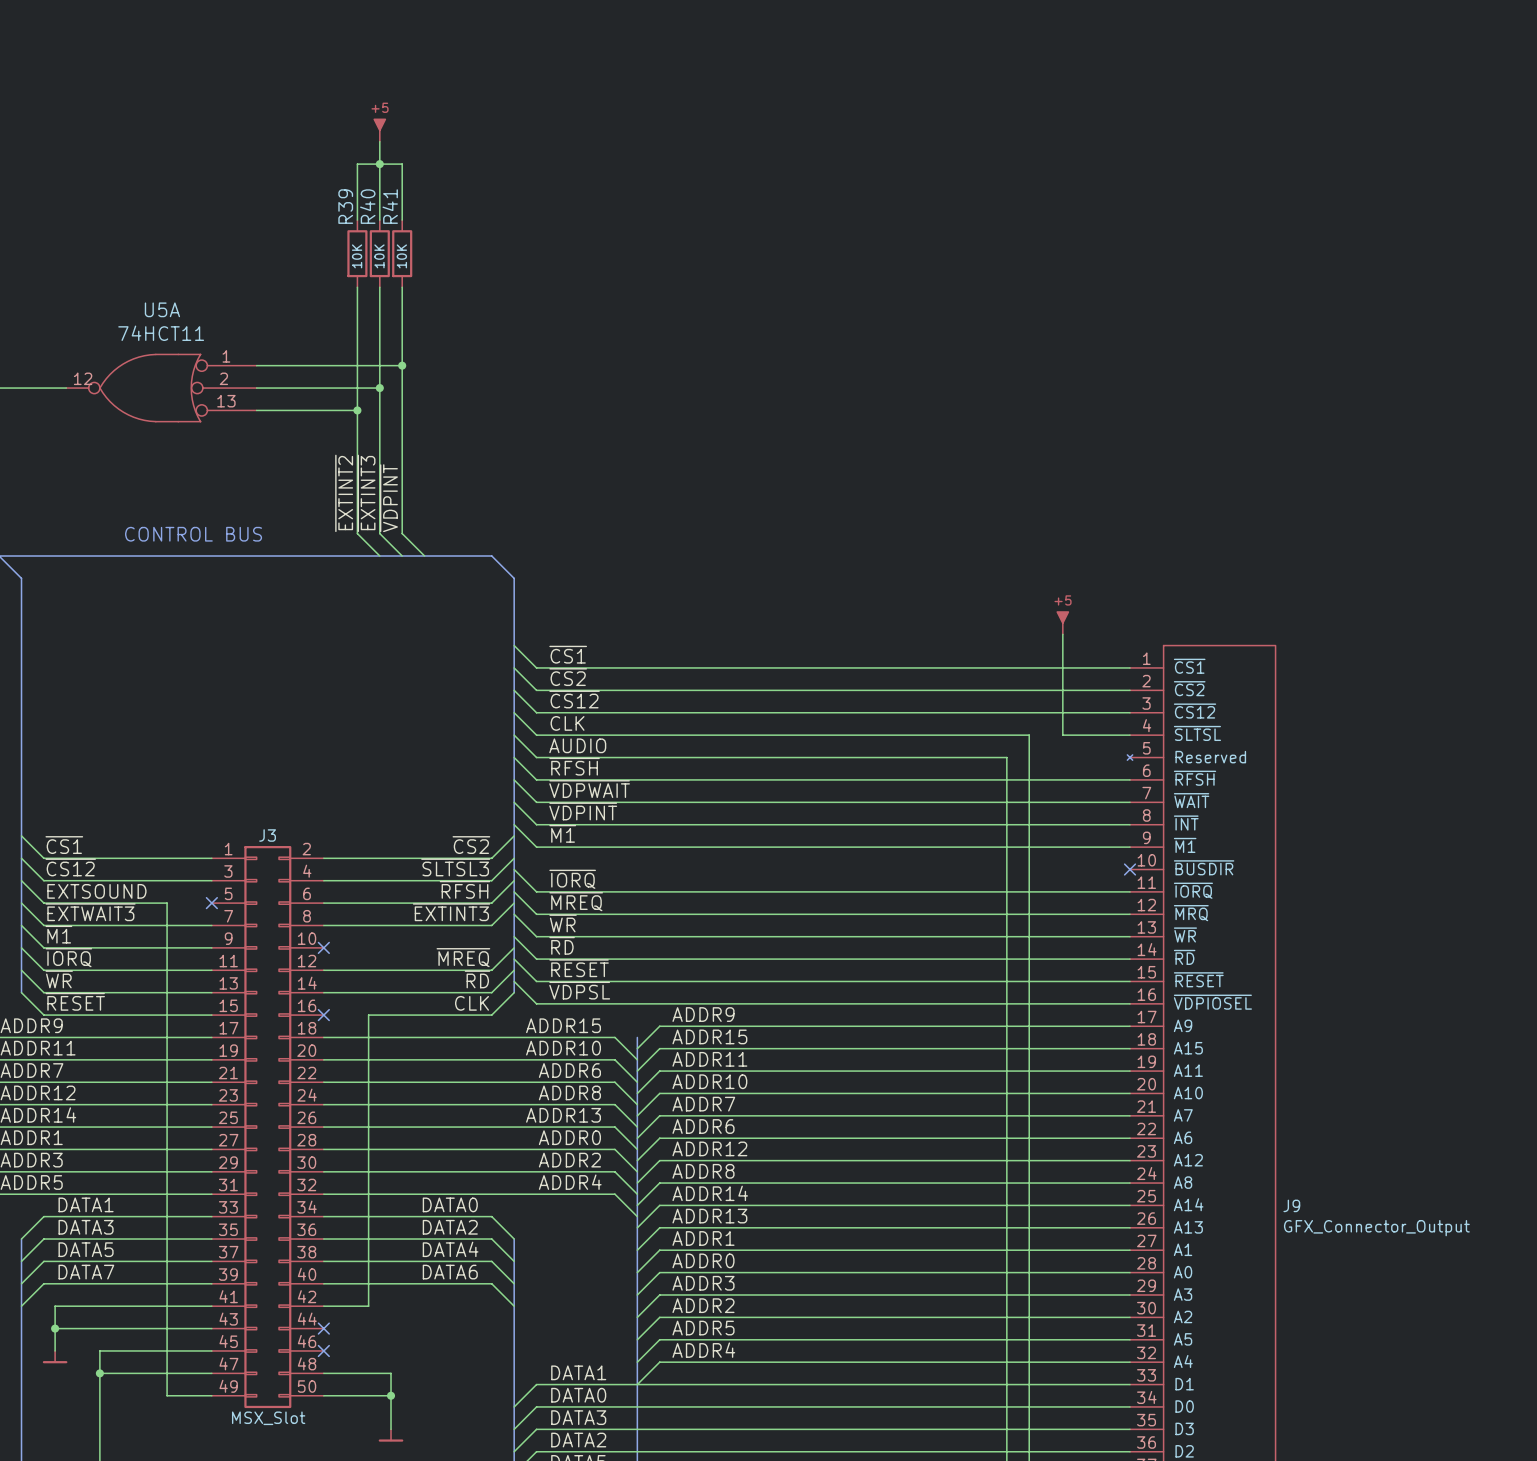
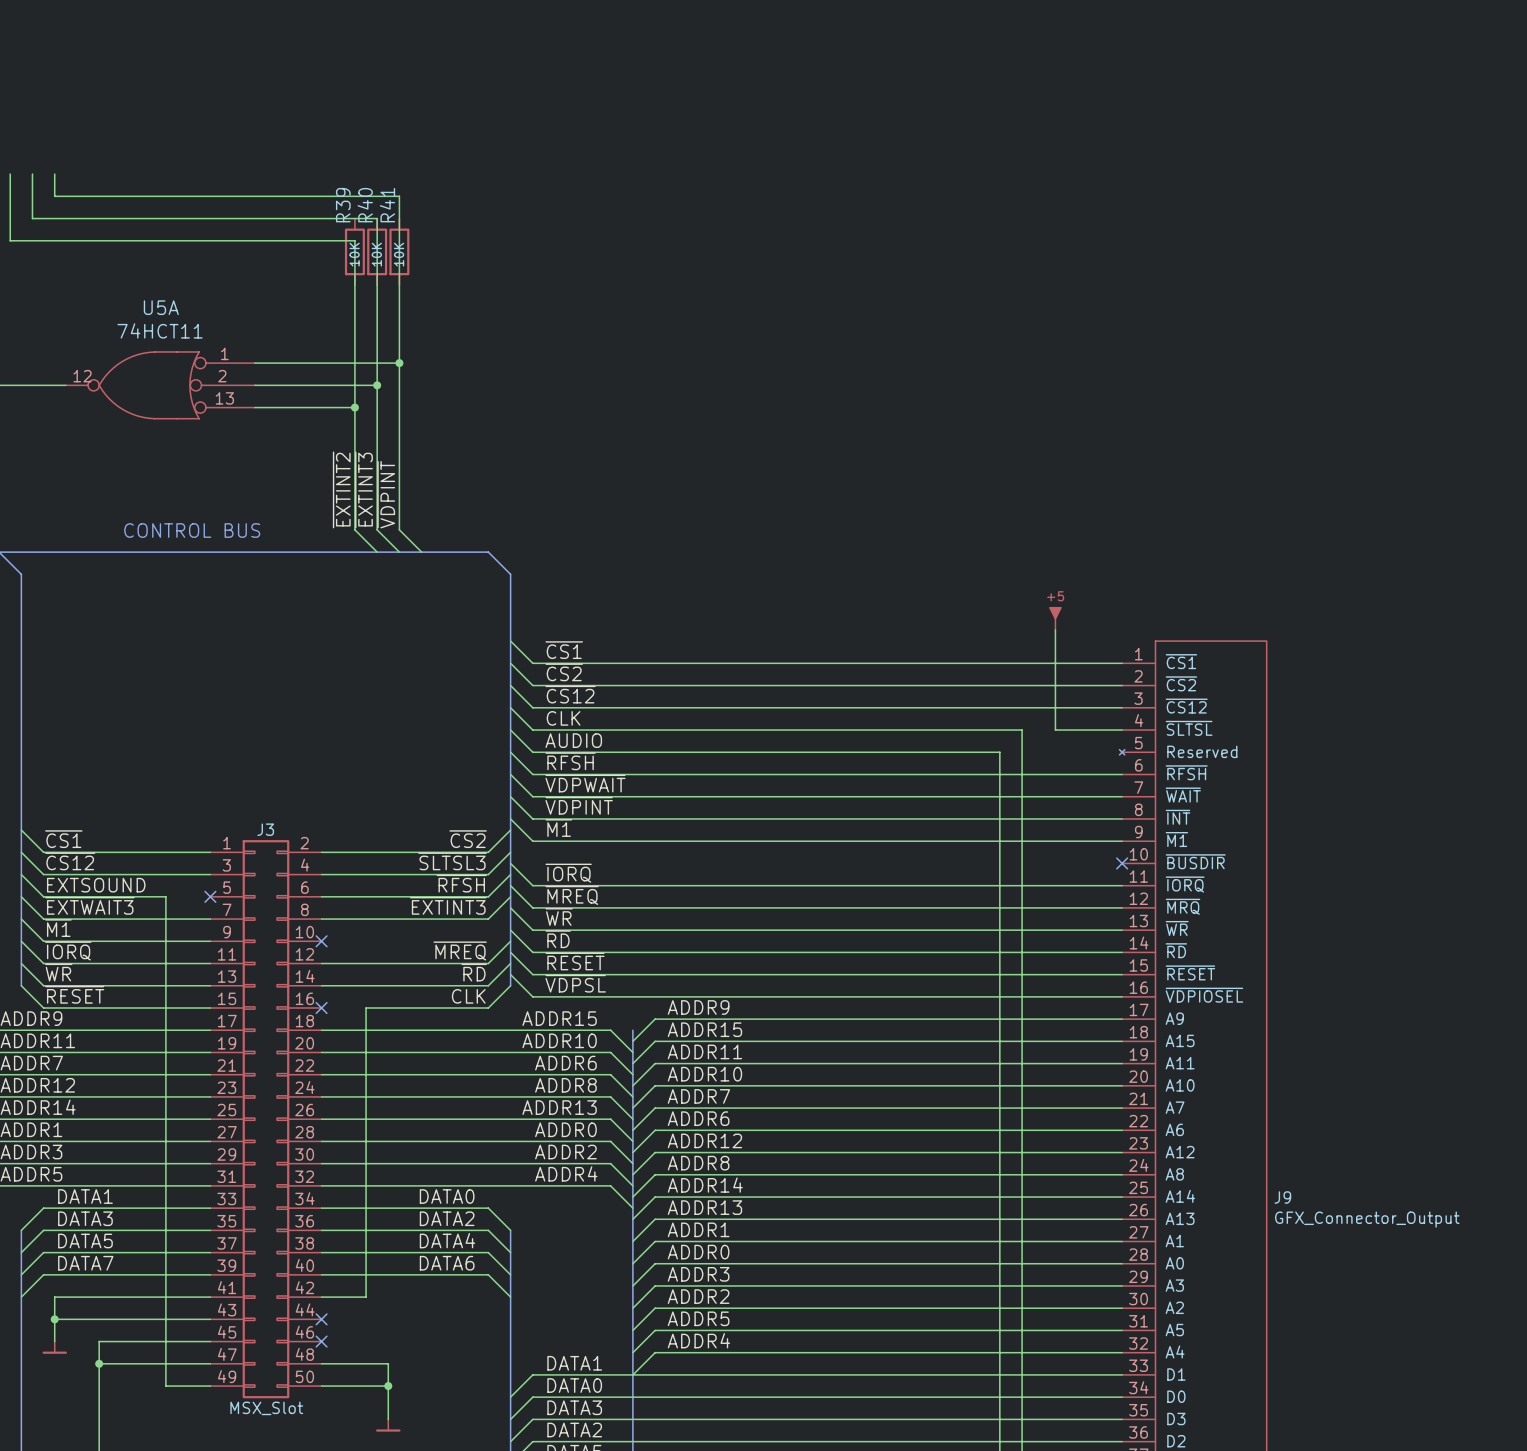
power symbol: (379, 130) -> none
wire: (379, 141) (379, 220) -> none
junction: (379, 164) -> none
wire: none -> (10, 174) (10, 240) (354, 240) (354, 285)
wire: none -> (32, 174) (32, 218) (377, 218) (377, 285)
wire: (402, 197) (402, 164) (357, 164) (357, 220) -> (399, 196) (54, 196) (54, 174)
wire: none -> (399, 218) (399, 285)

